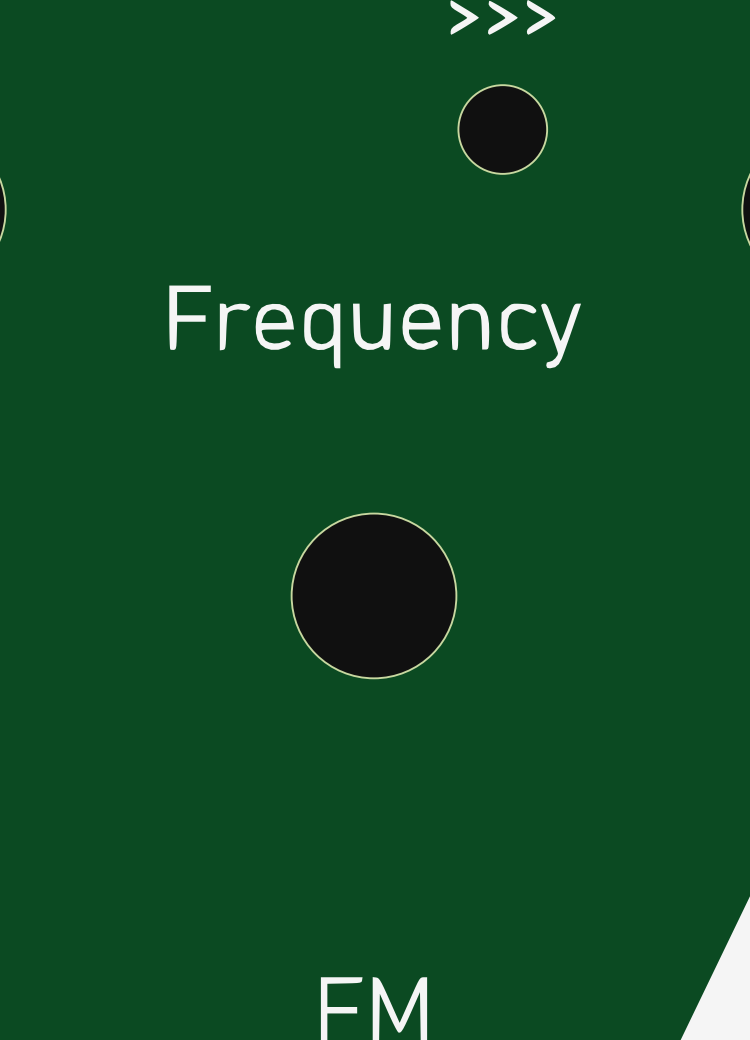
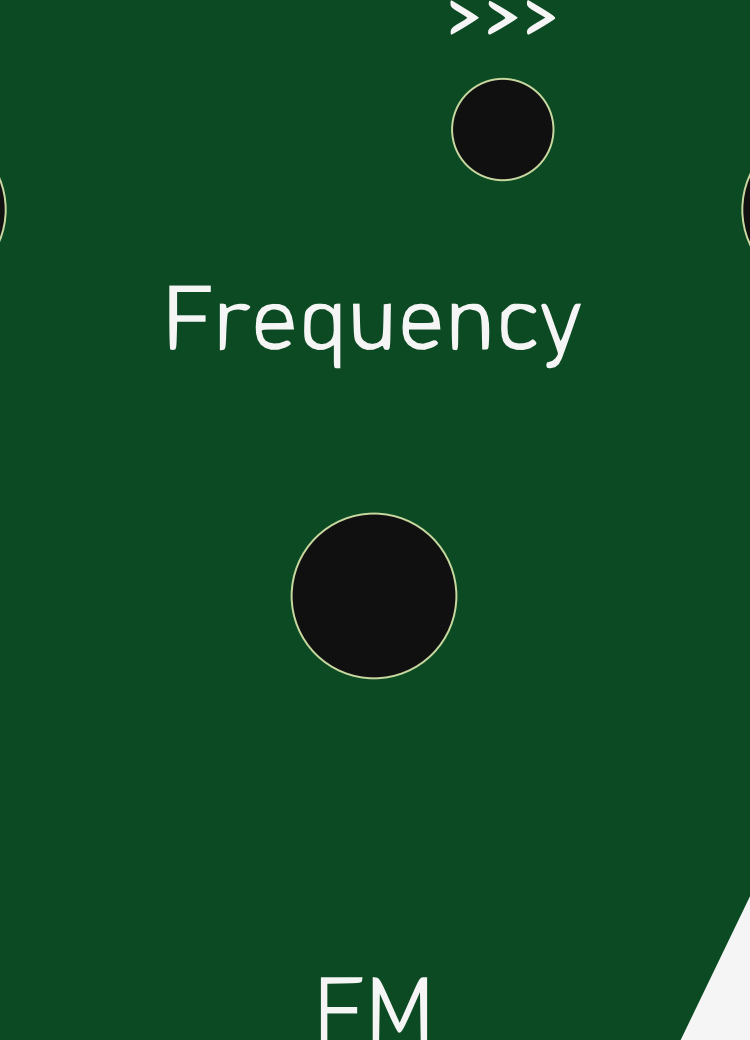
part footprint: [458, 85, 548, 174] -> [452, 78, 554, 181]

